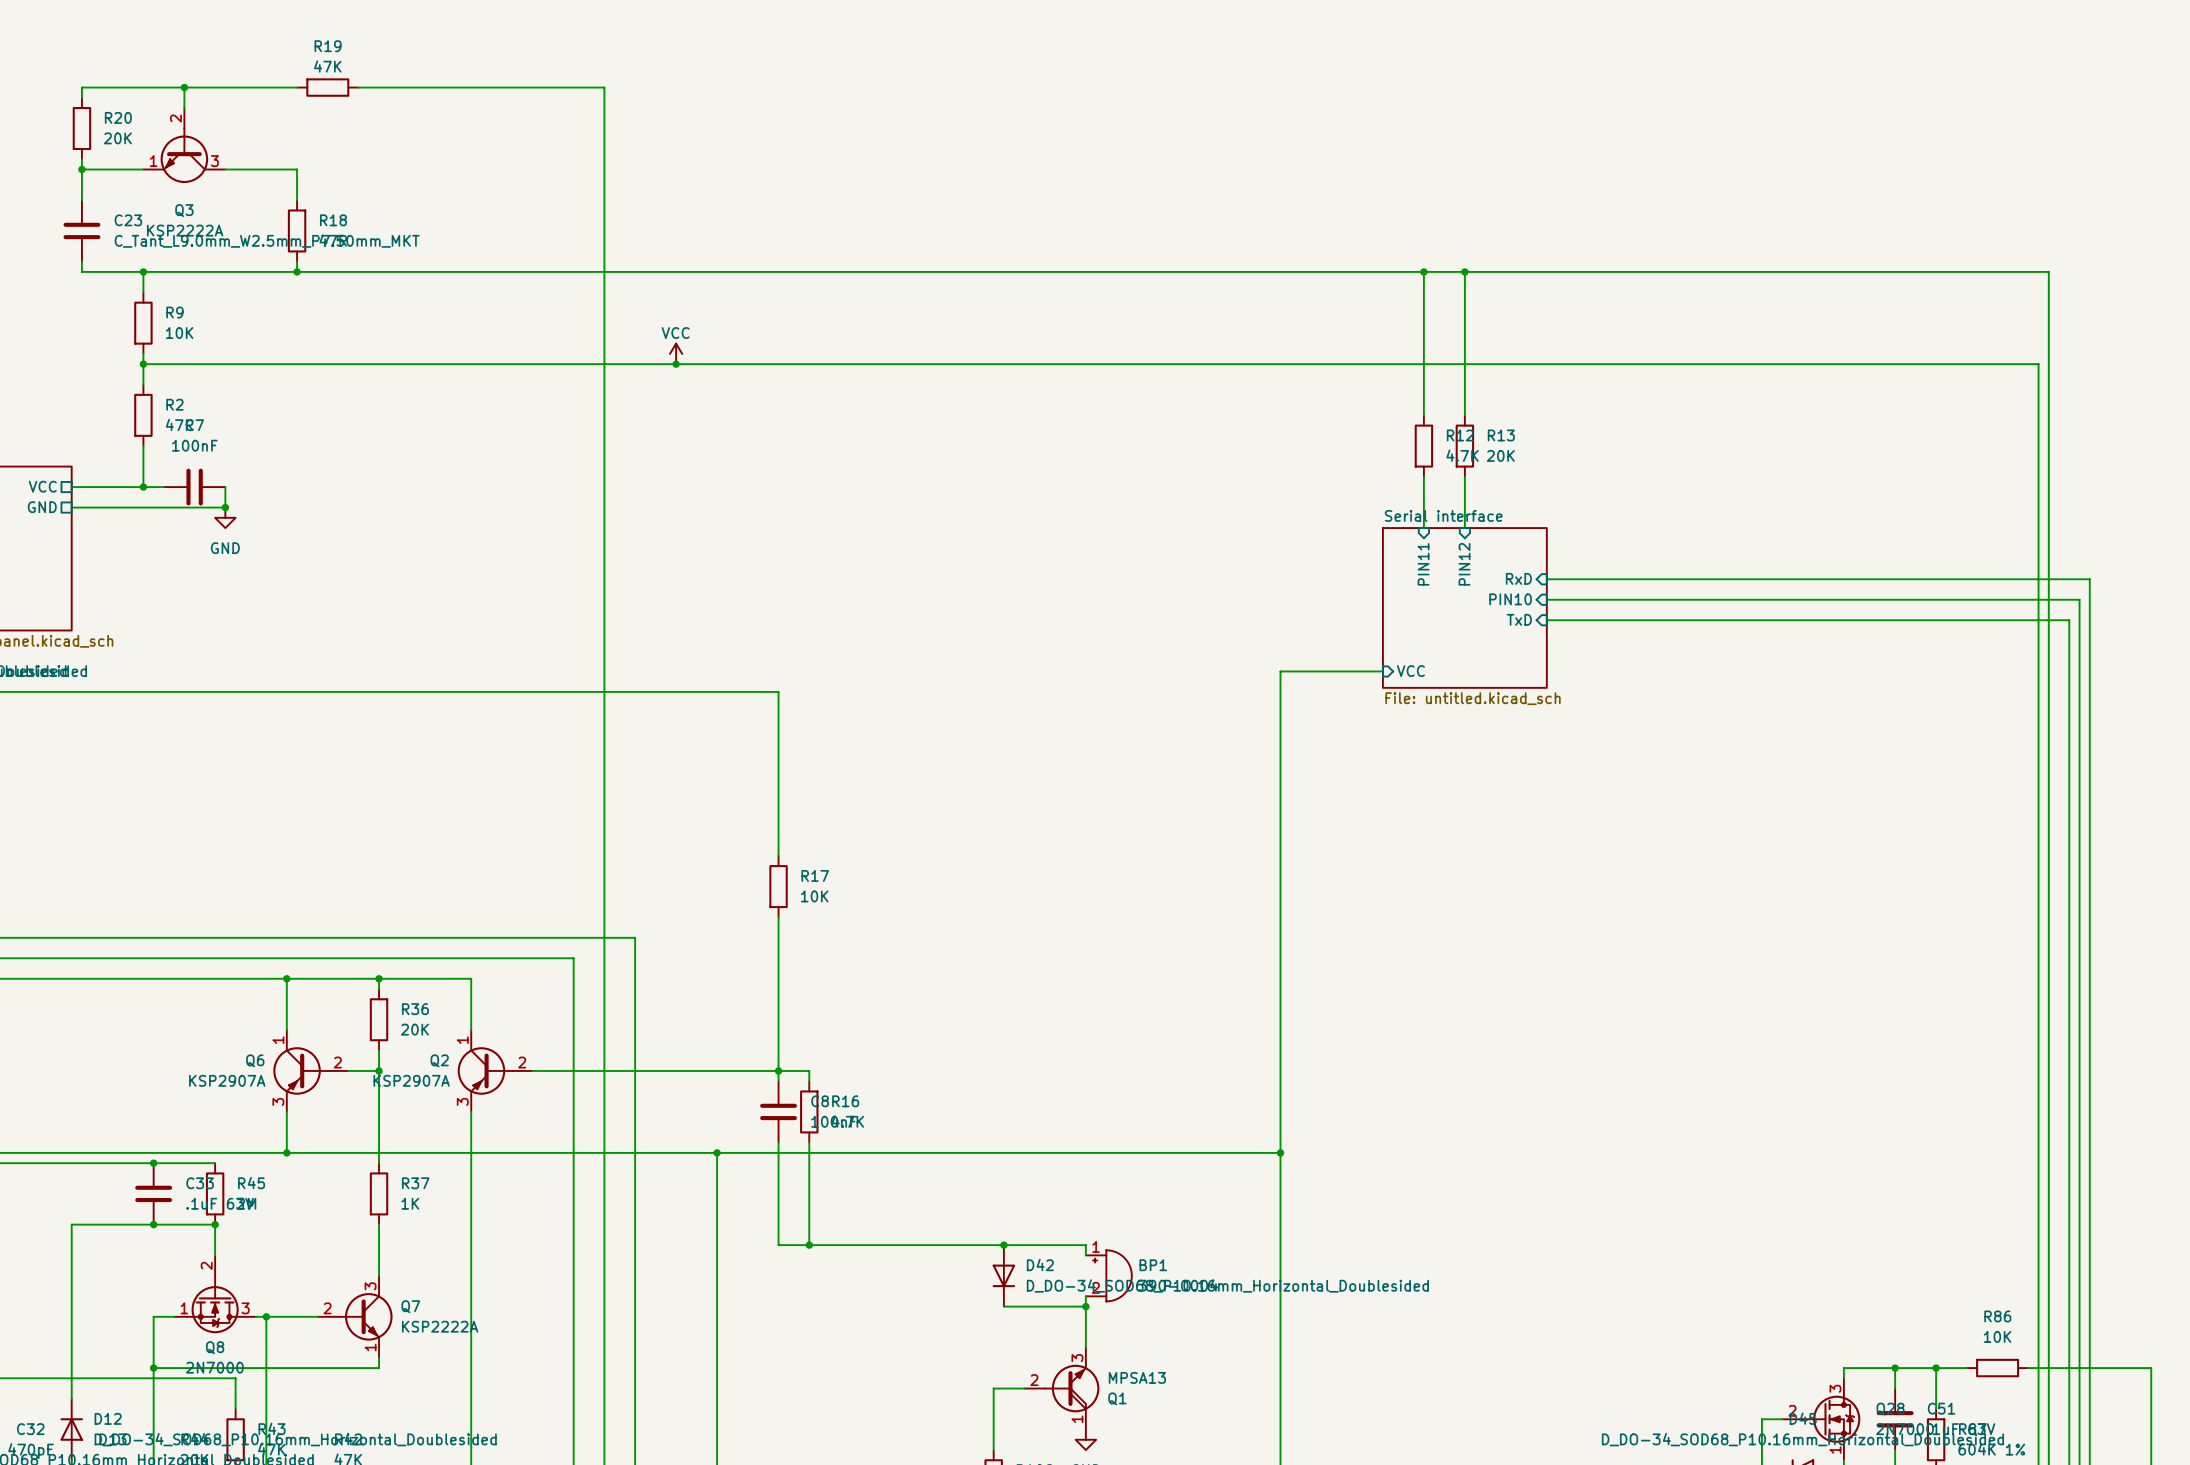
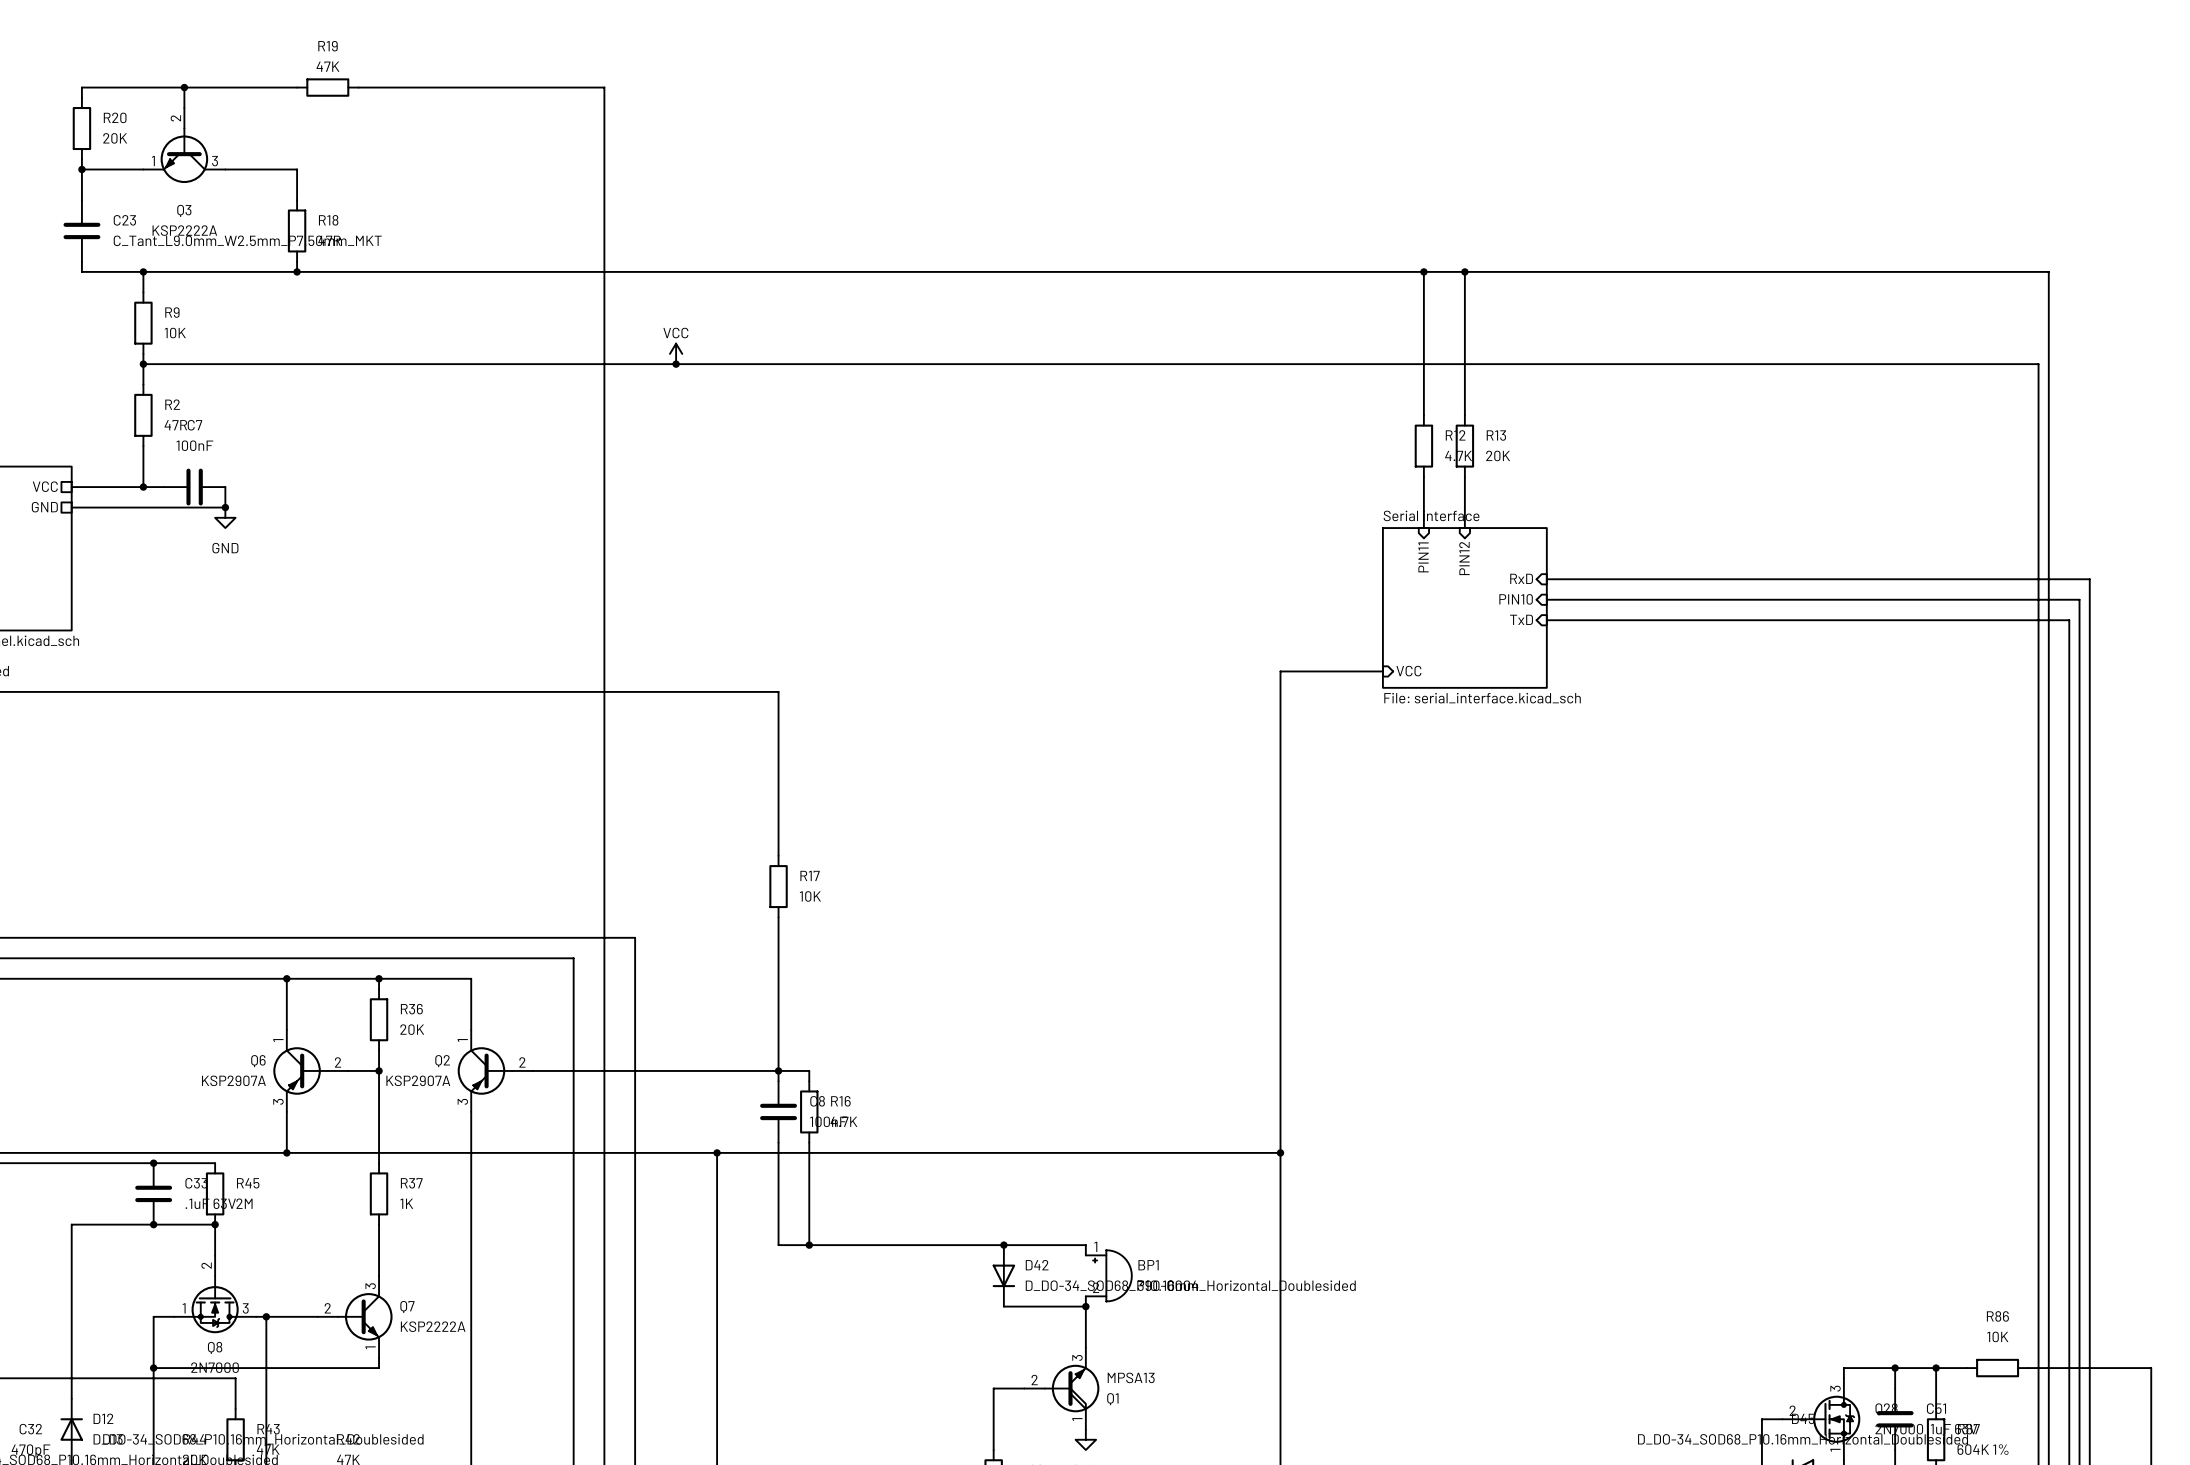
sheet Serial interface value: File: untitled.kicad_sch (1473, 698) -> File: serial_interface.kicad_sch (1482, 698)

